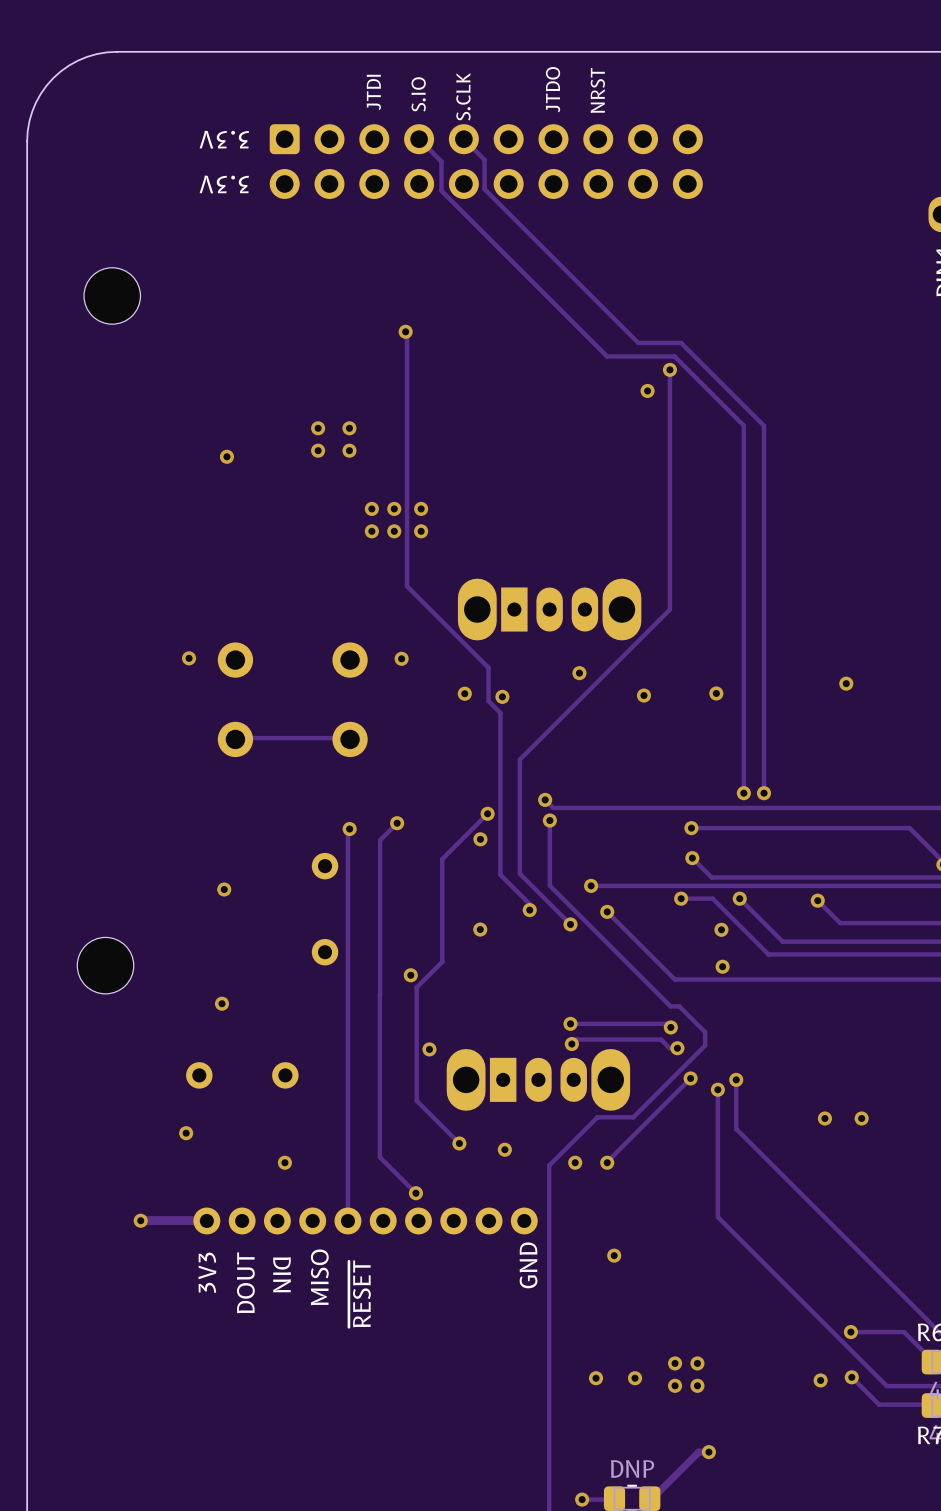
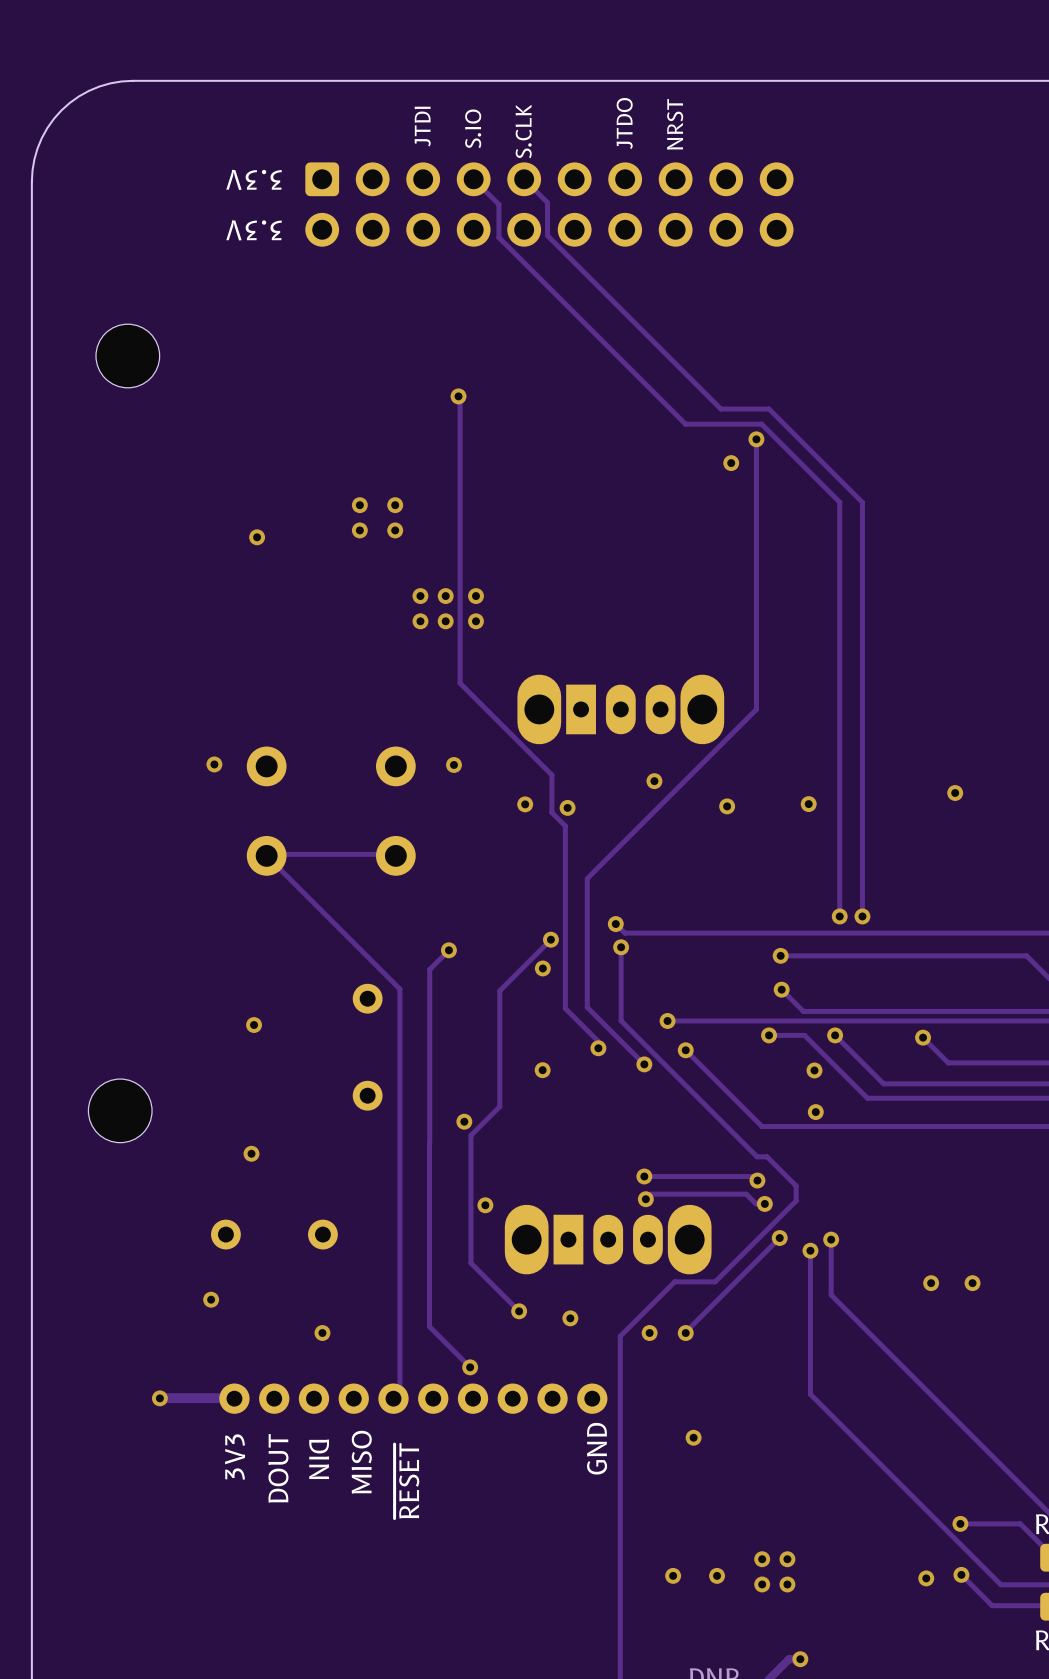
track: none -> (266, 855) (399, 989) (399, 1398)
track: (349, 829) (347, 830) (347, 1220) -> none
via: (349, 829) -> none

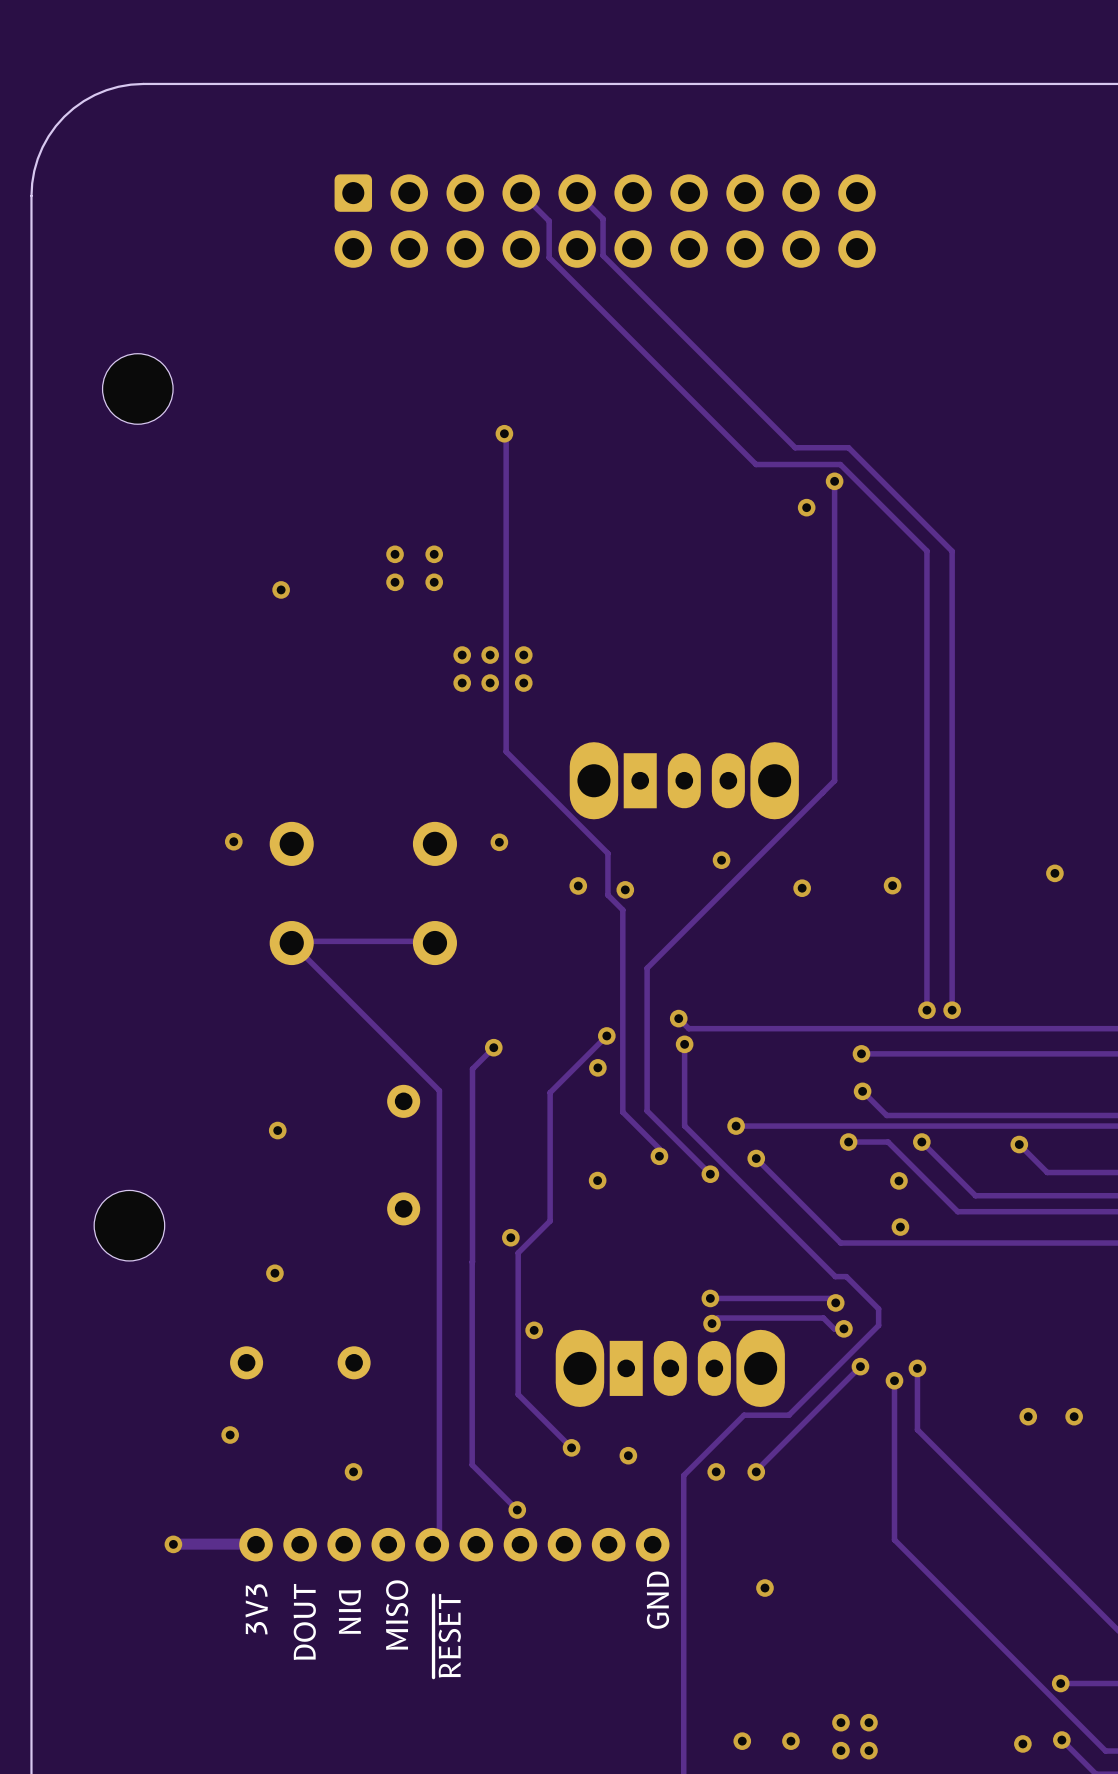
text: JTDO (624, 123) -> none
text: NRST (675, 124) -> none
text: JTDI (422, 126) -> none
text: S.IO (473, 128) -> none
text: S.CLK (523, 131) -> none
text: 3.3V (253, 179) -> none
text: 3.3V (253, 230) -> none

